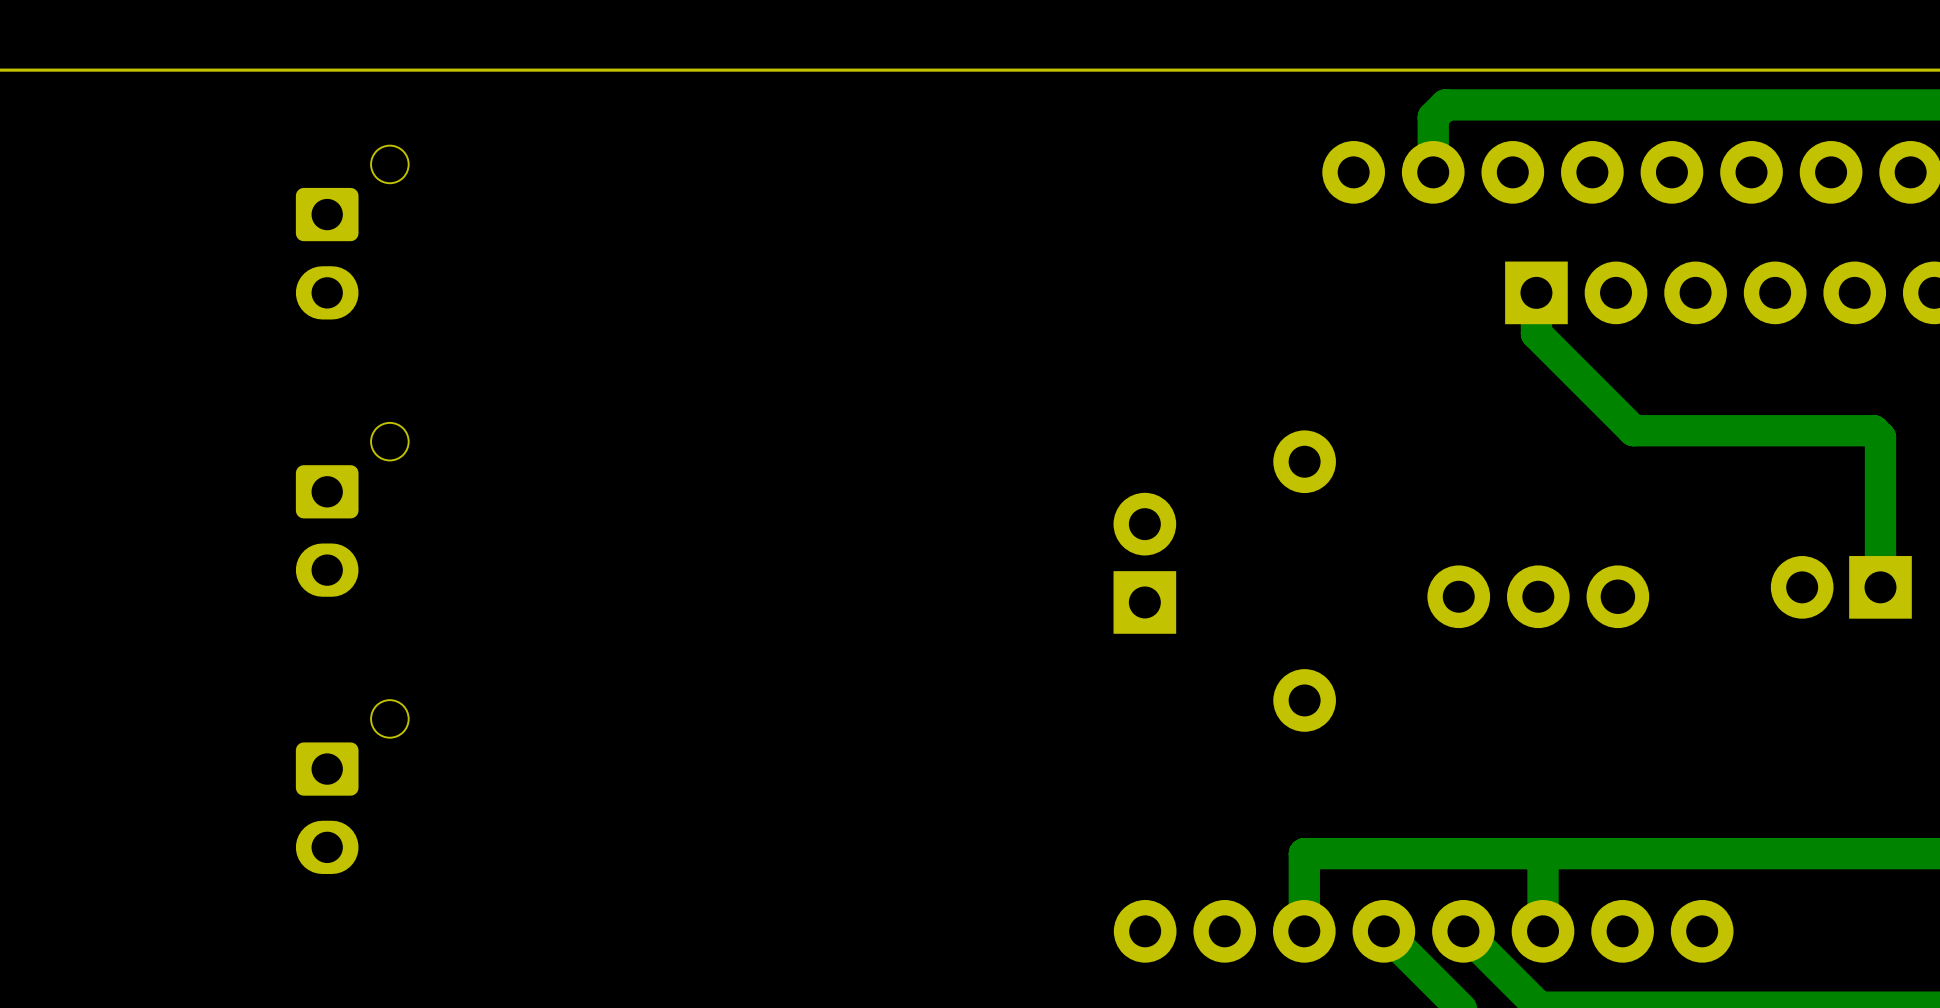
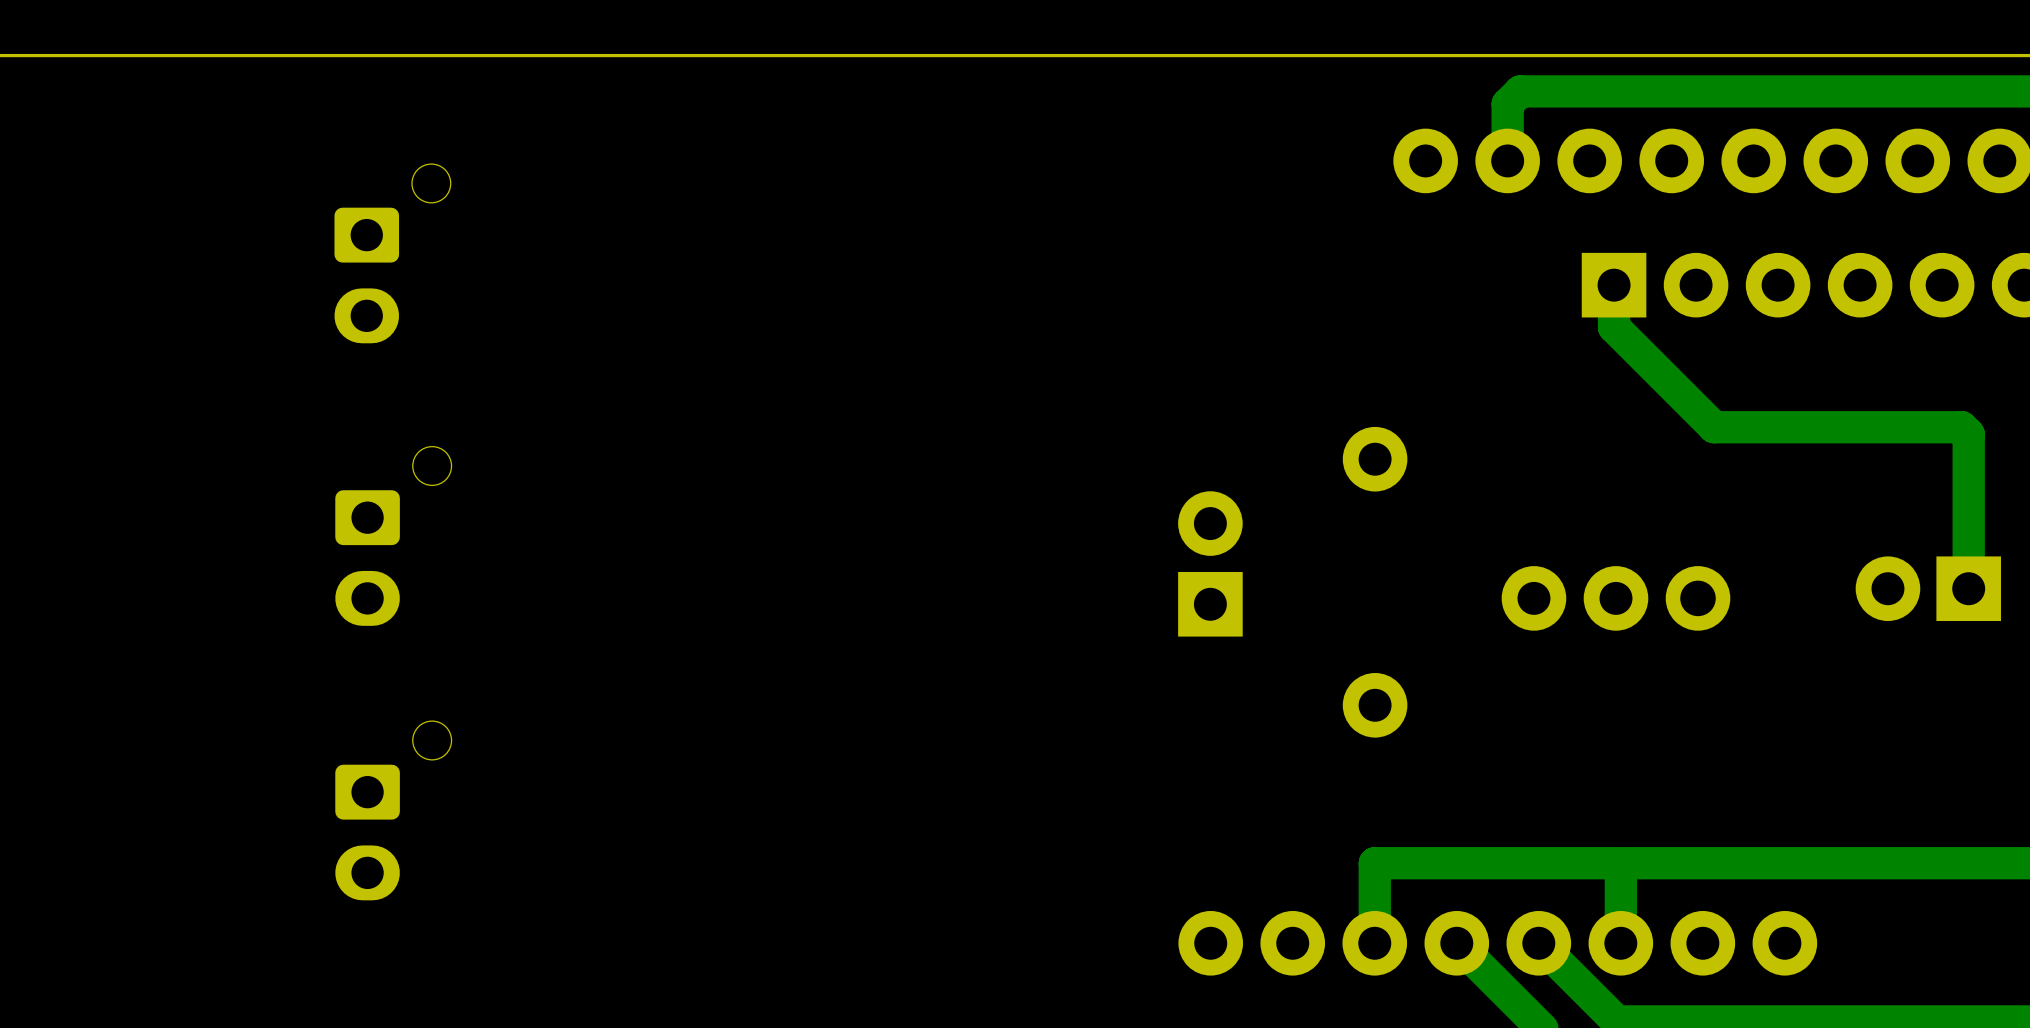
part position: (352, 232) -> (392, 253)
part position: (352, 509) -> (393, 536)
part position: (352, 787) -> (393, 810)

